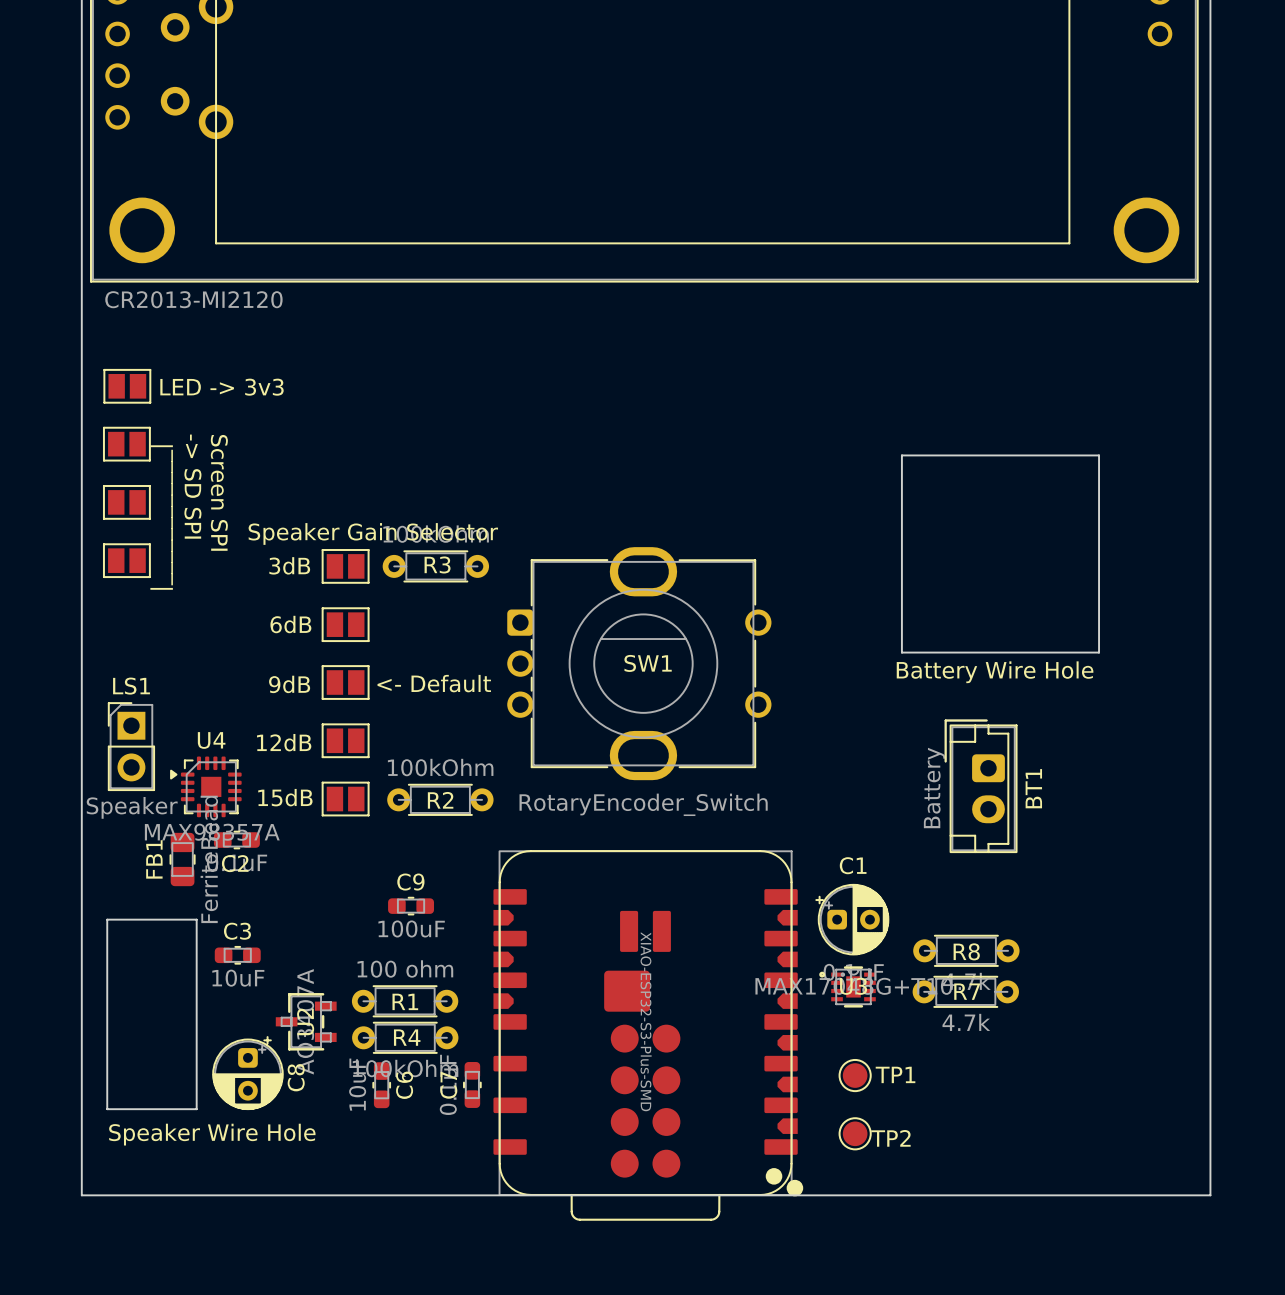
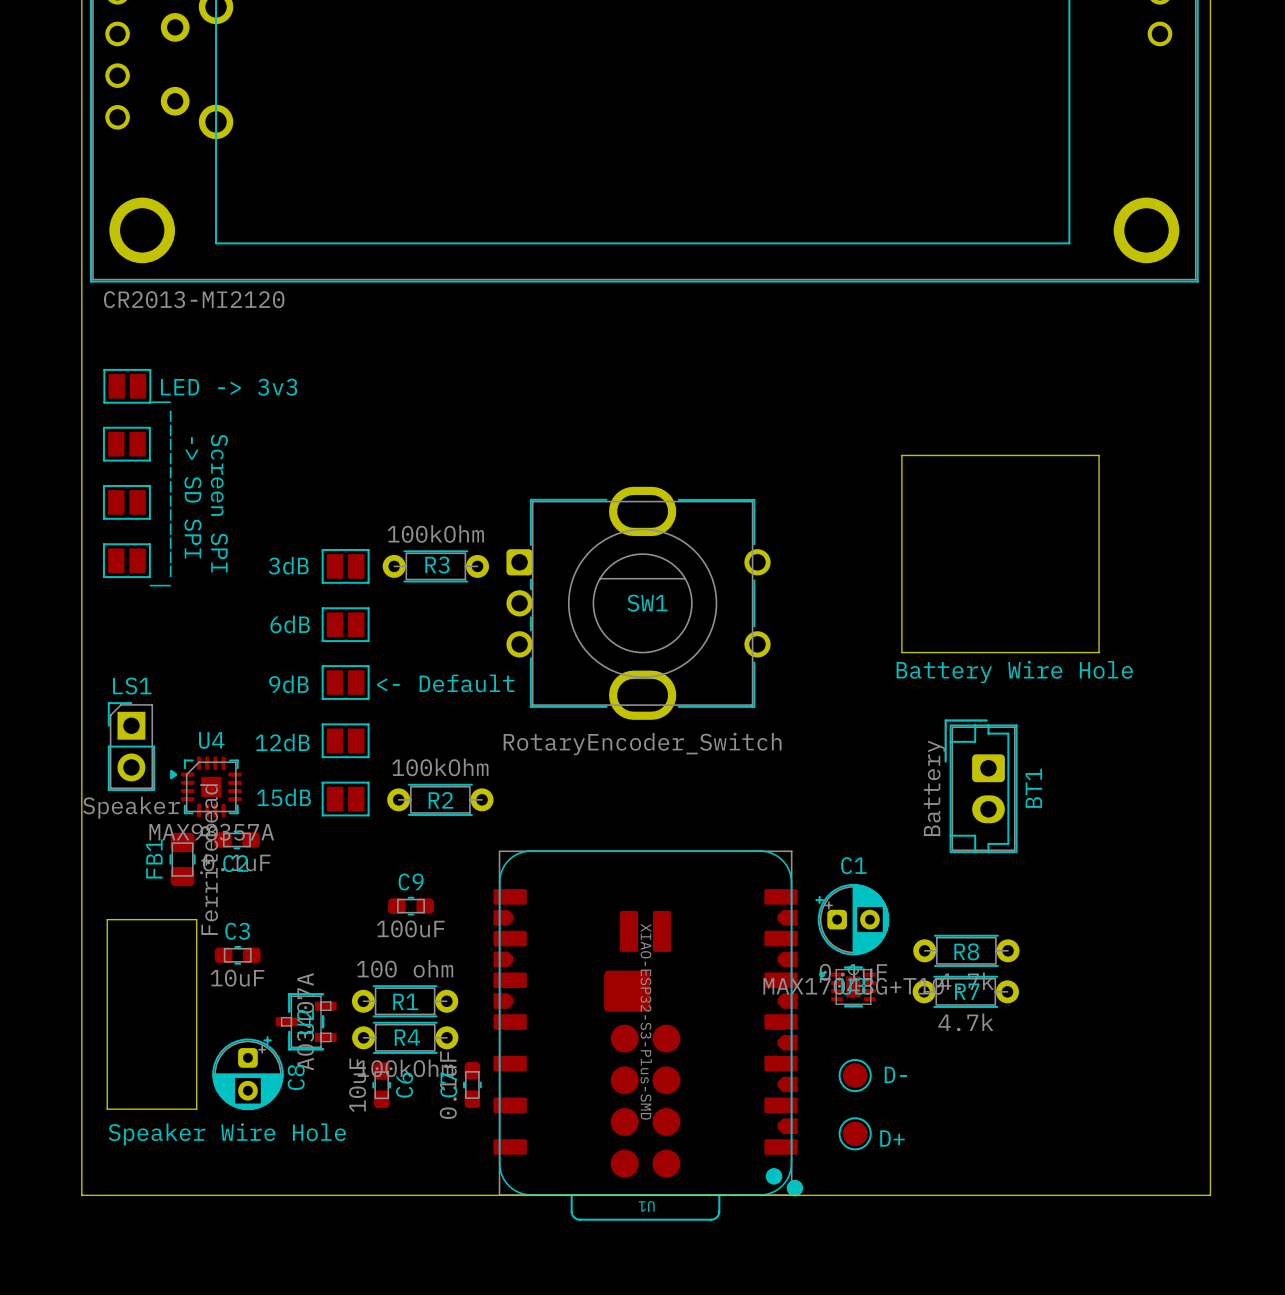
text: Speaker Gain Selector (373, 533) -> none
SW1 position: (639, 663) -> (638, 603)
TP1 name: TP1 (895, 1074) -> D- (895, 1074)
TP2 name: TP2 (890, 1138) -> D+ (892, 1138)
U1 name: none -> U1 (646, 1206)

